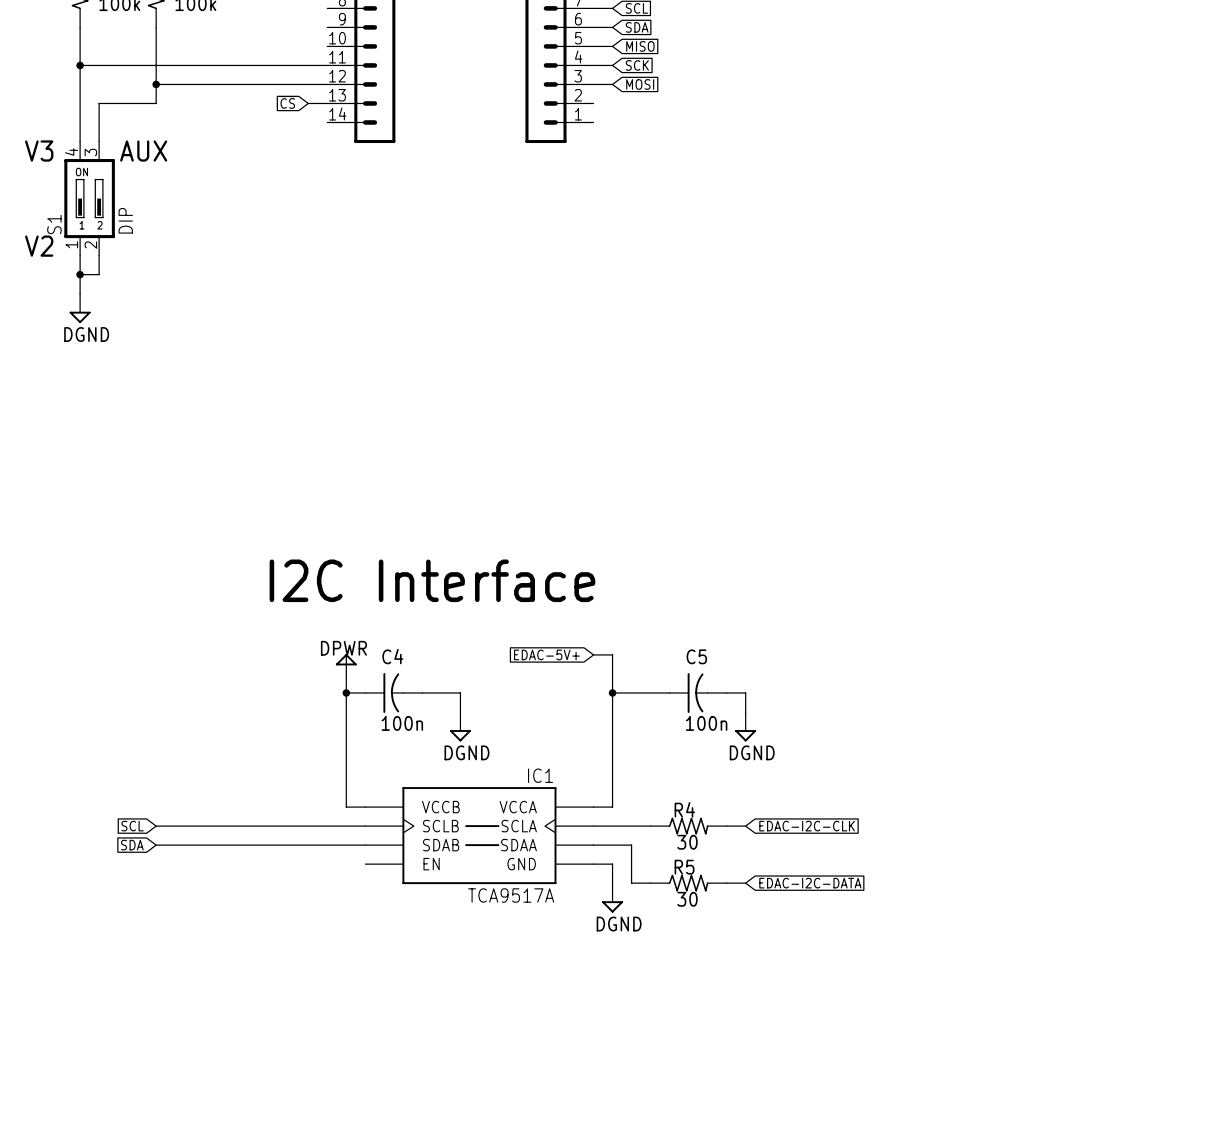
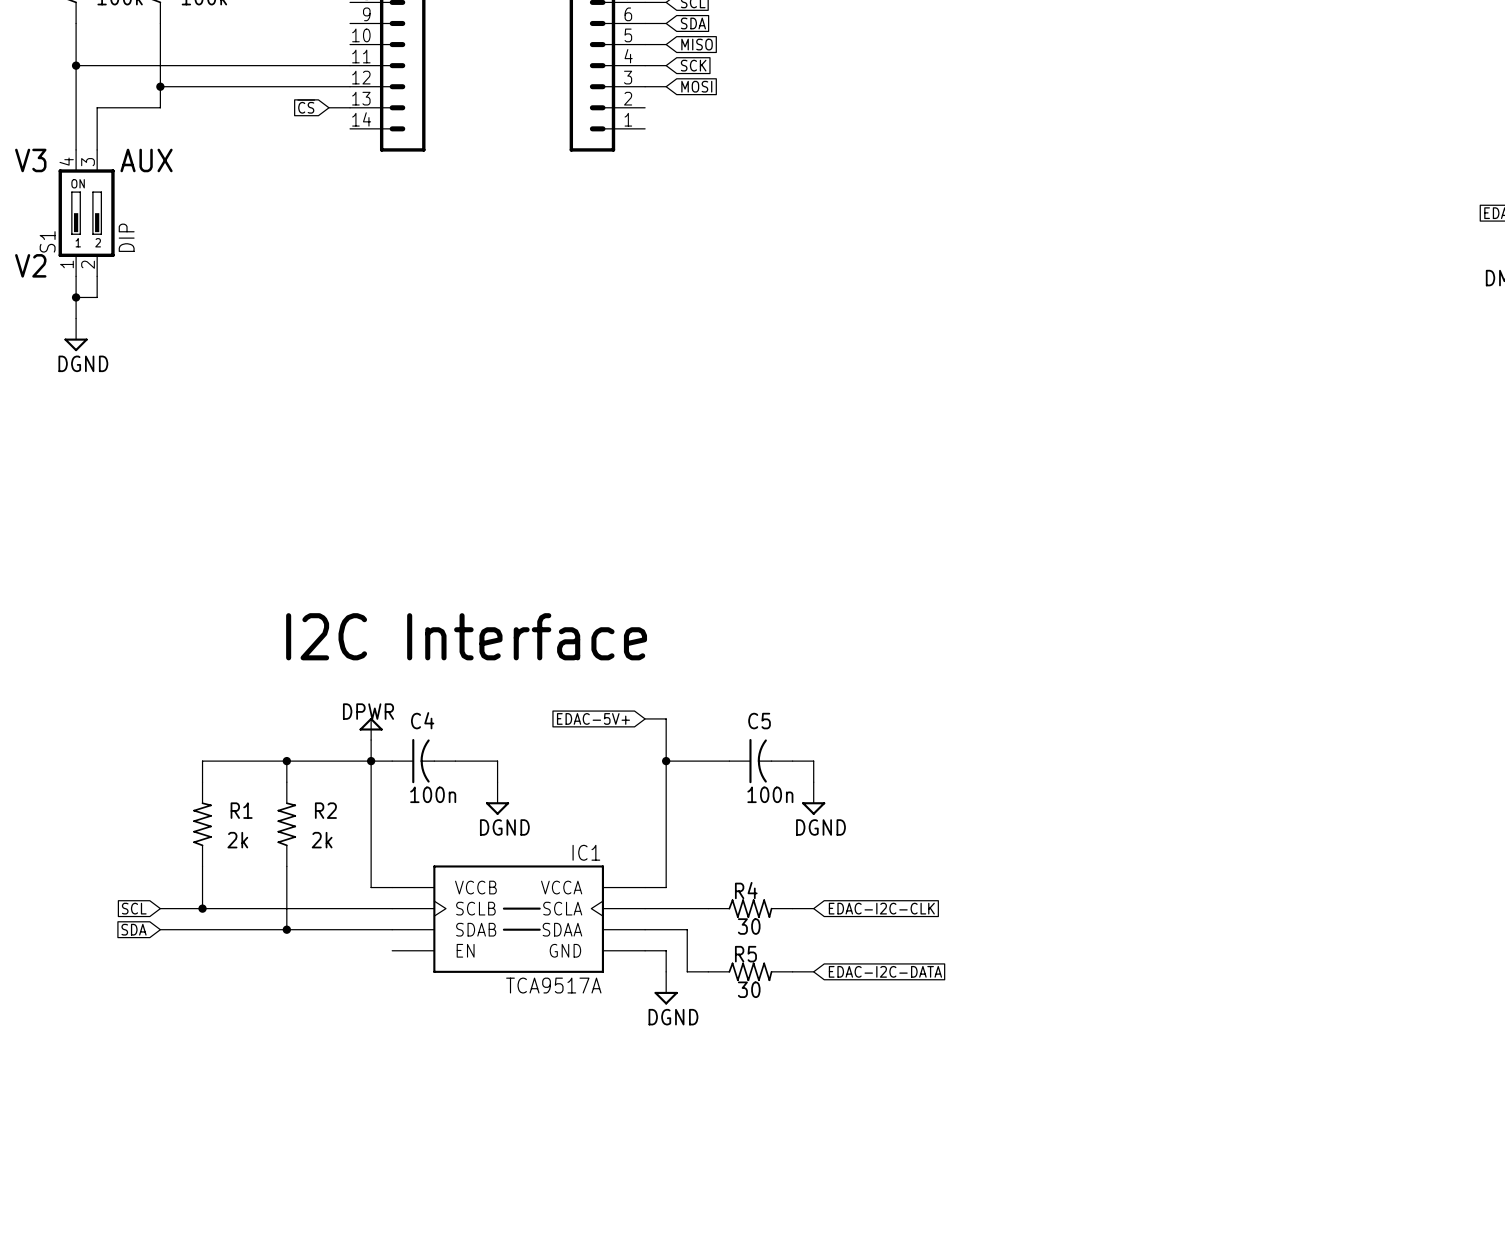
wire: none -> (286, 761) (286, 782)
junction: none -> (286, 761)
wire: none -> (371, 761) (202, 761) (202, 782)
R1: none -> 2k (202, 824)
R2: none -> 2k (286, 824)
wire: none -> (202, 866) (202, 908)
wire: none -> (286, 866) (286, 929)
junction: none -> (202, 908)
junction: none -> (286, 929)

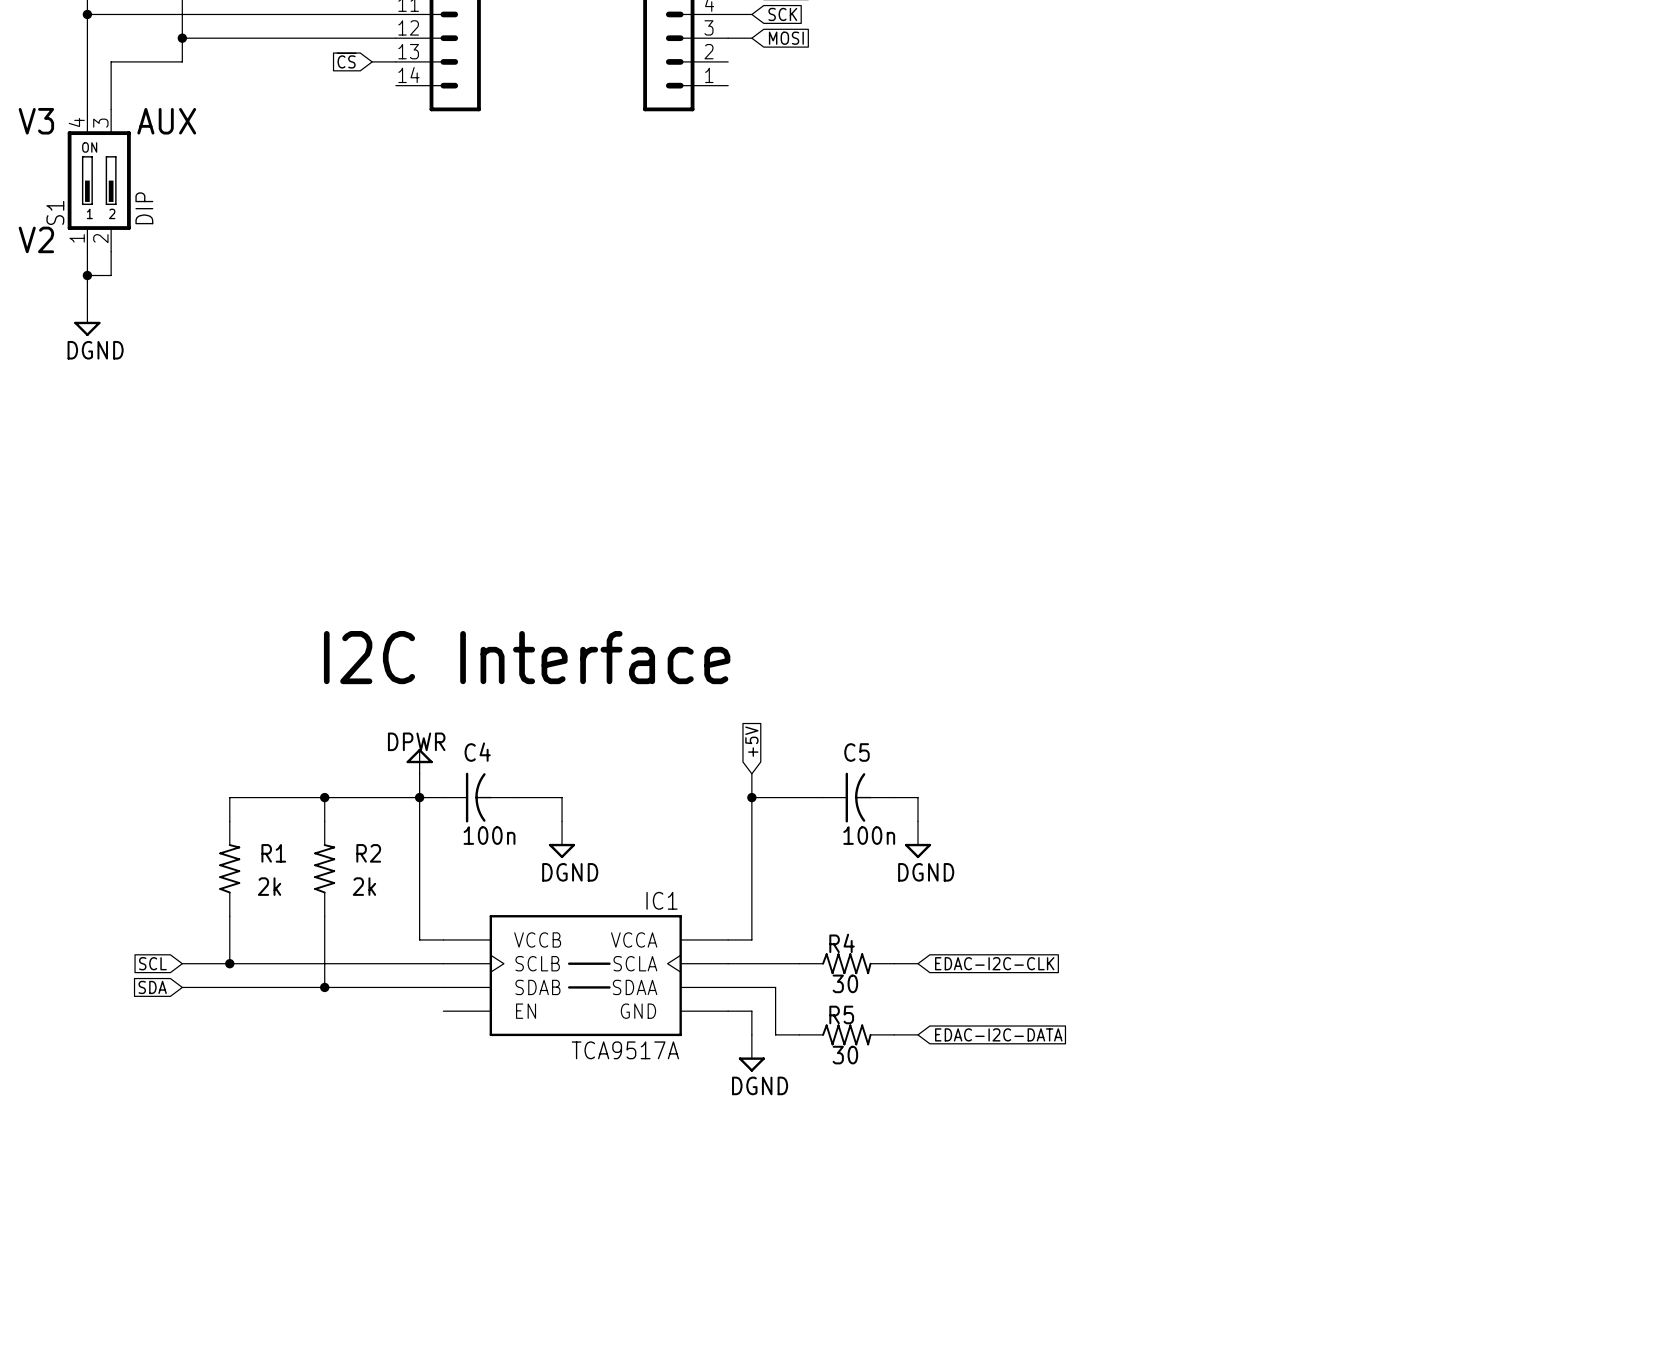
global label: none -> +5V (751, 741)
global label: EDAC-5V+ (593, 718) -> none
wire: (645, 718) (666, 718) (666, 740) -> none

